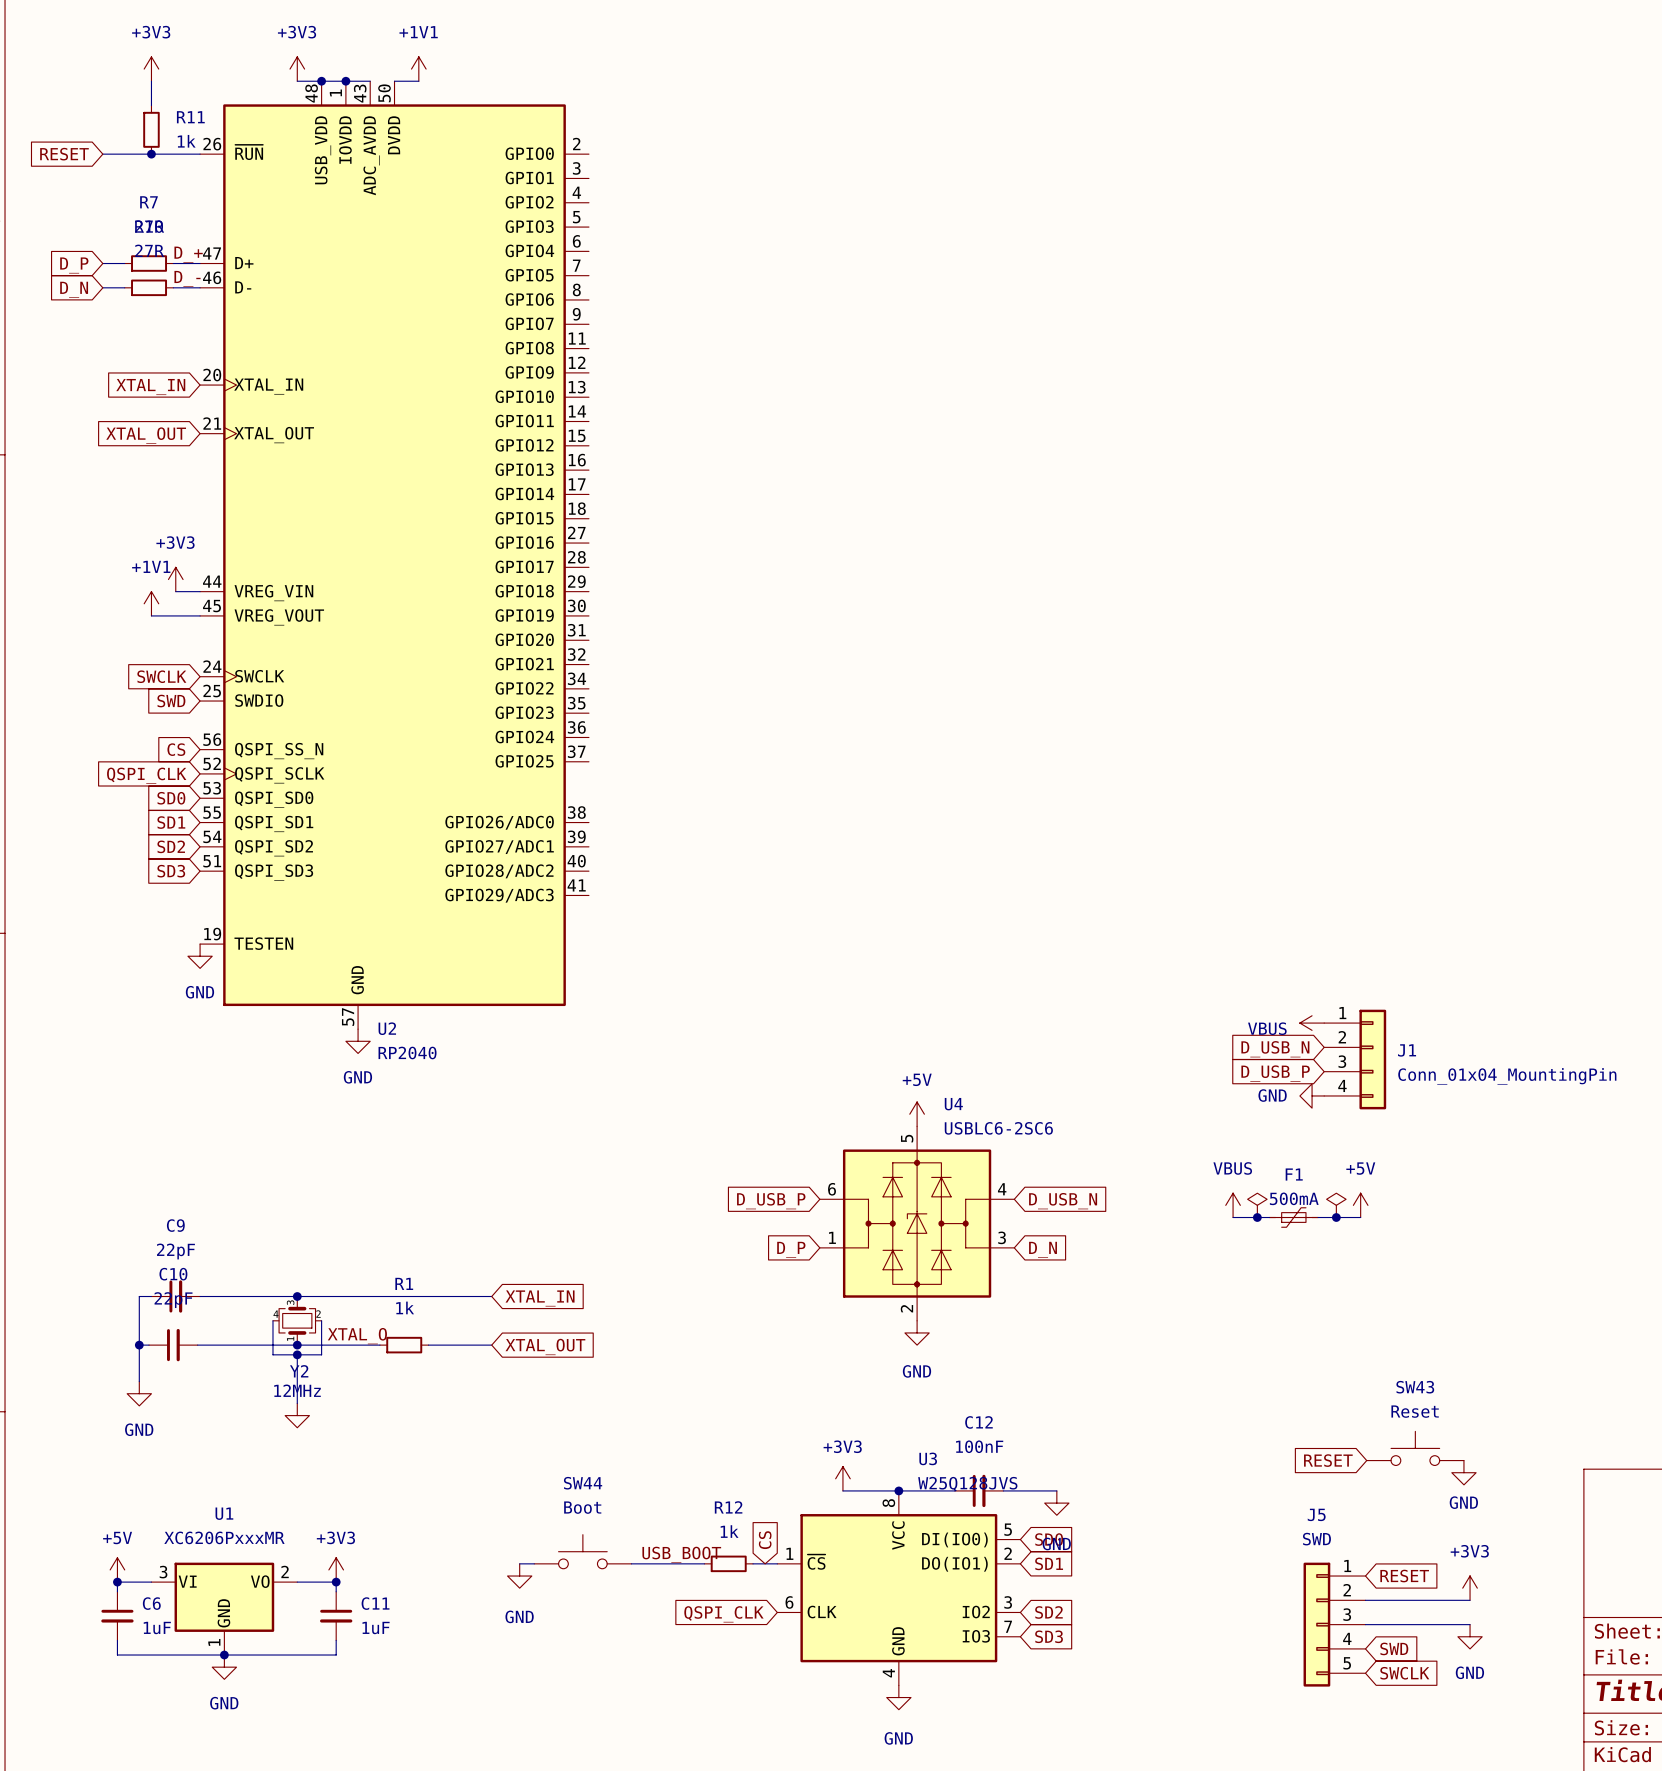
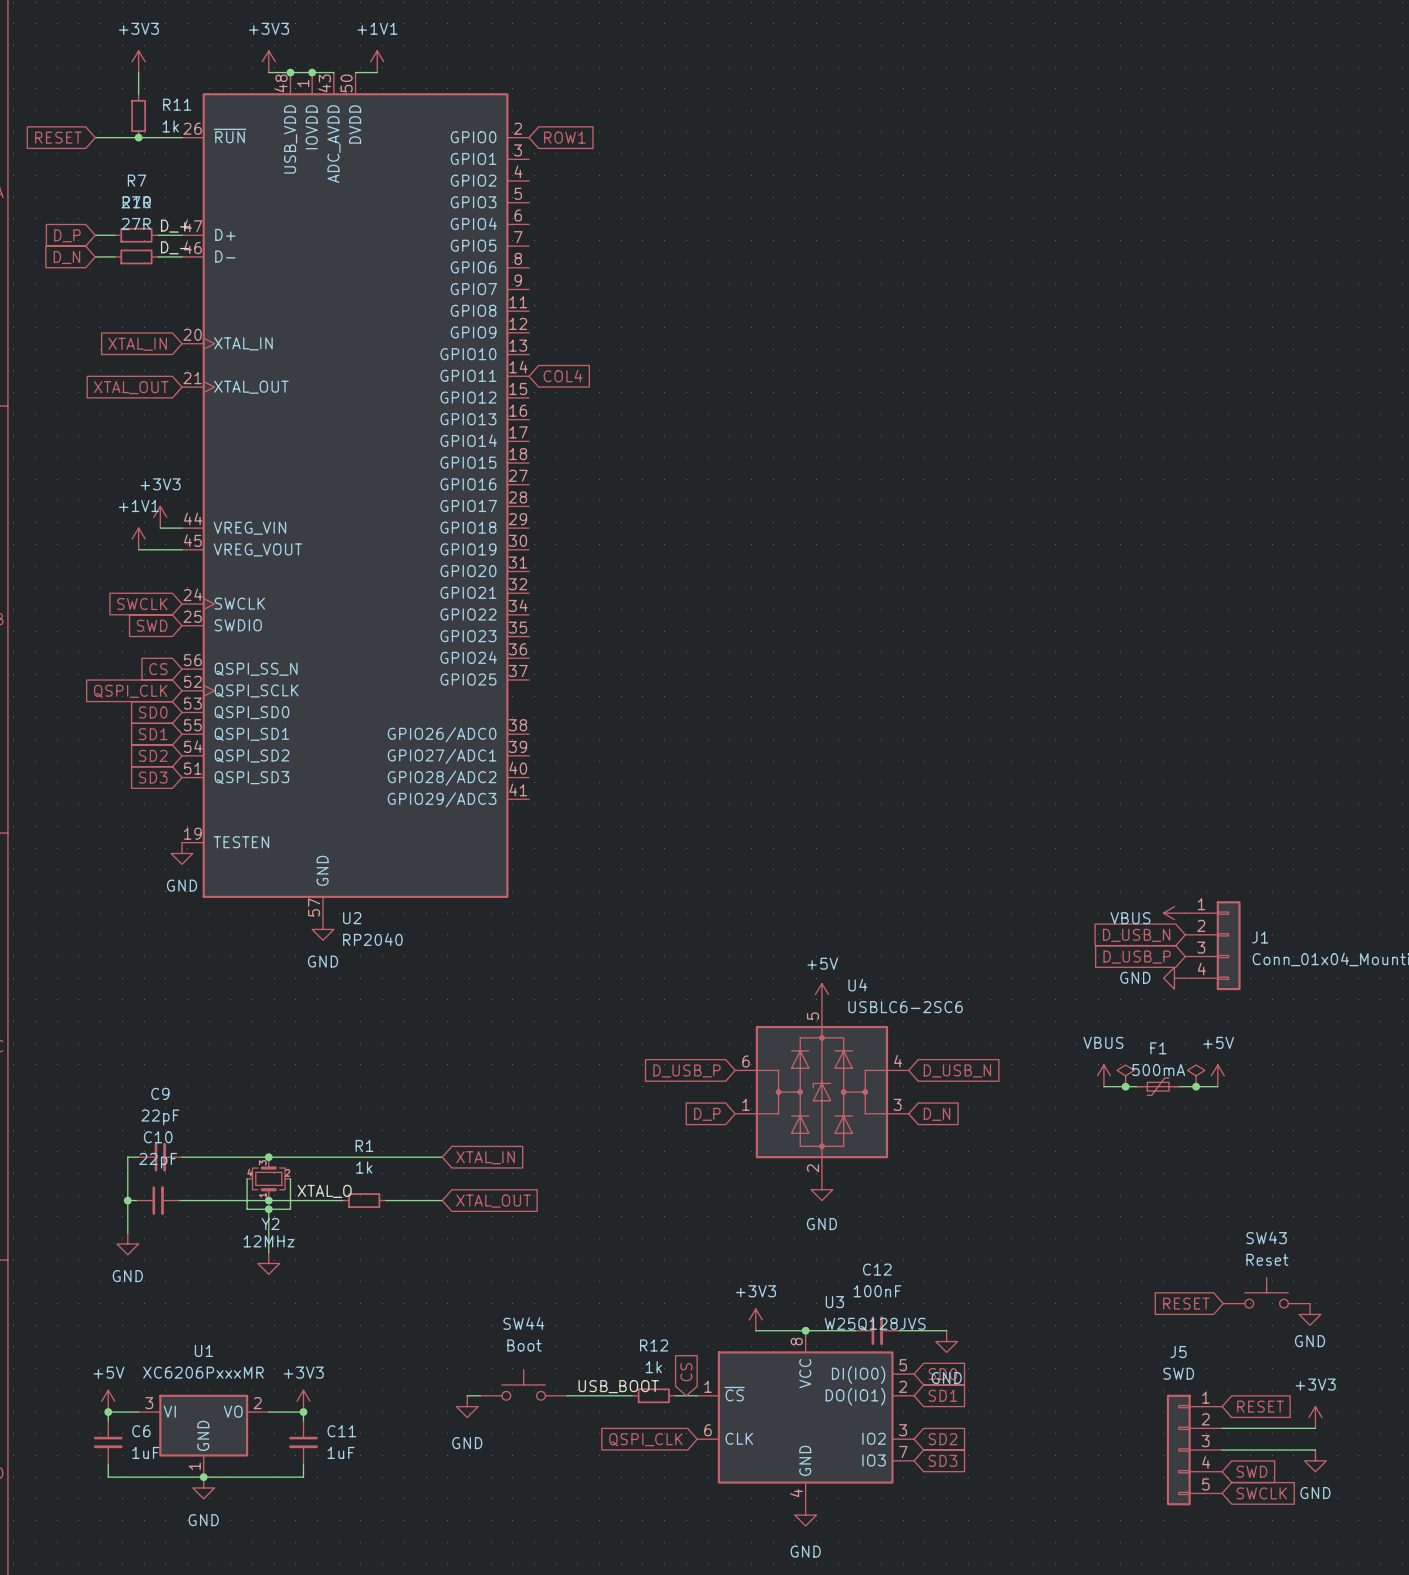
global label: none -> ROW1 (564, 137)
global label: none -> COL4 (563, 376)

